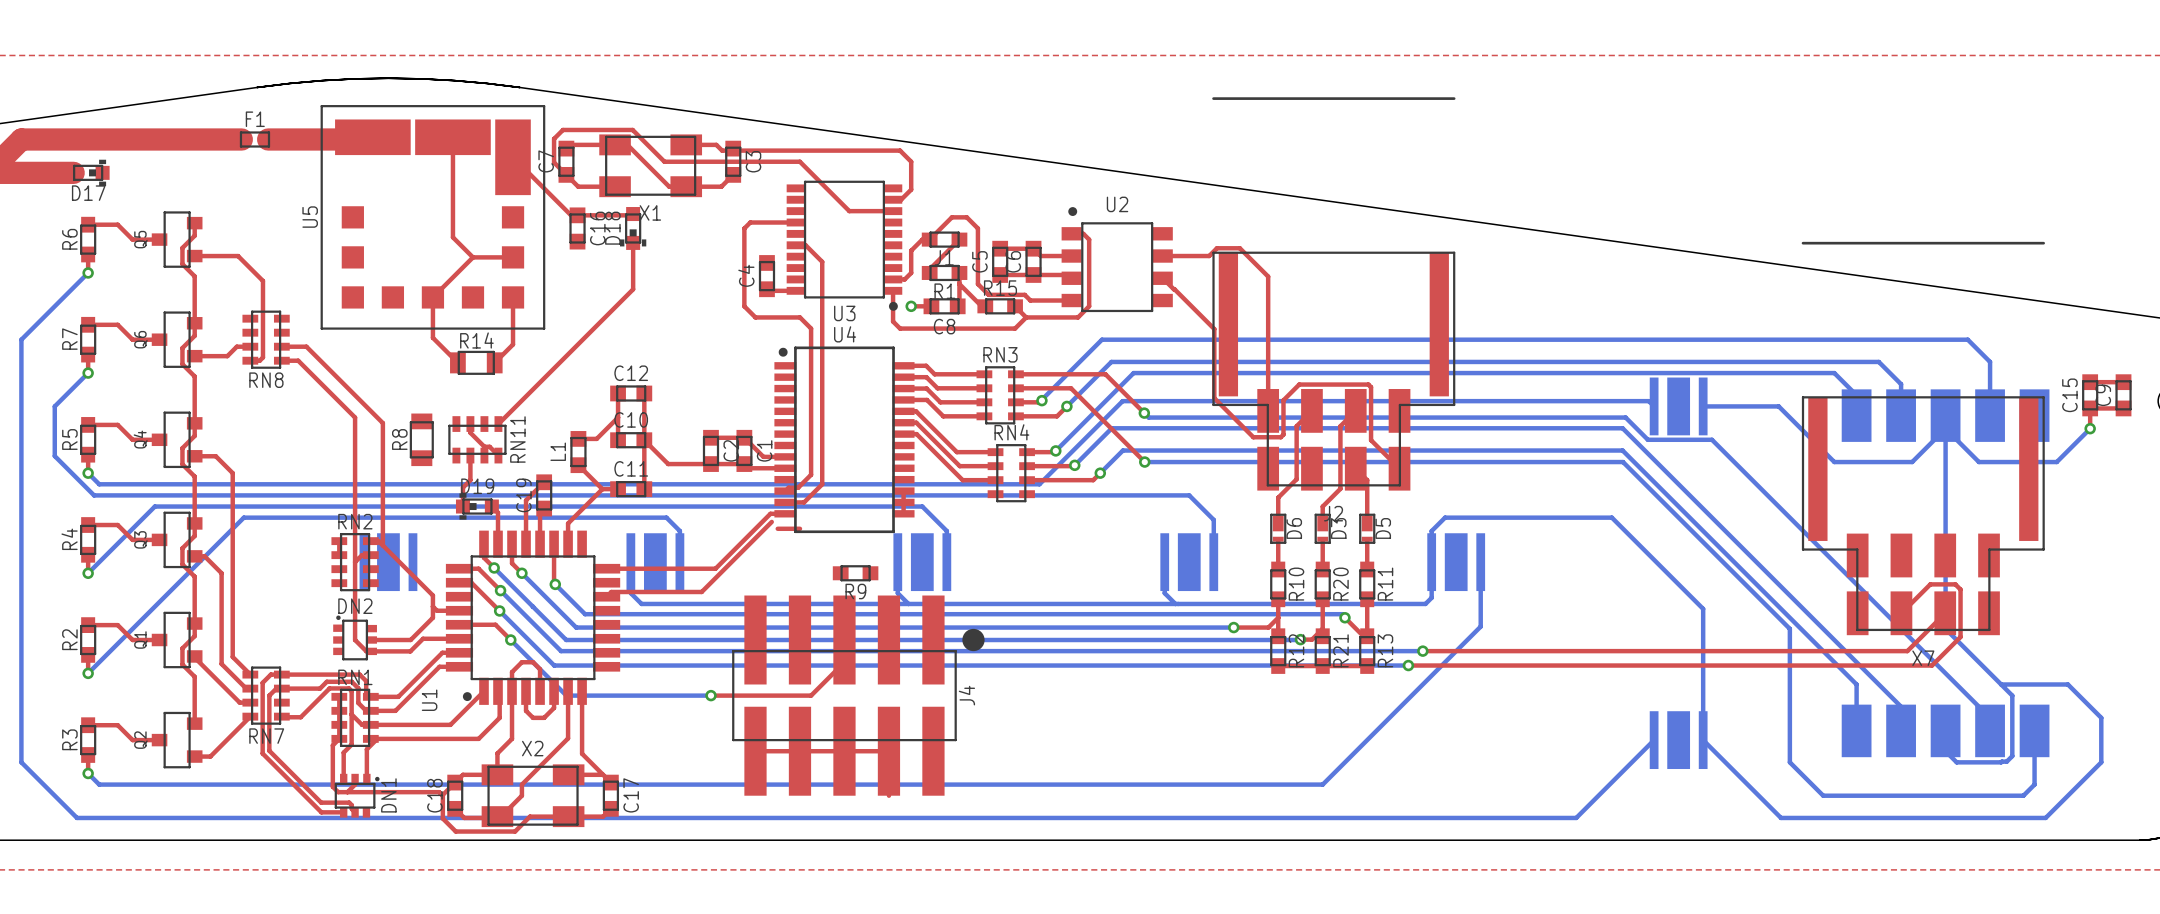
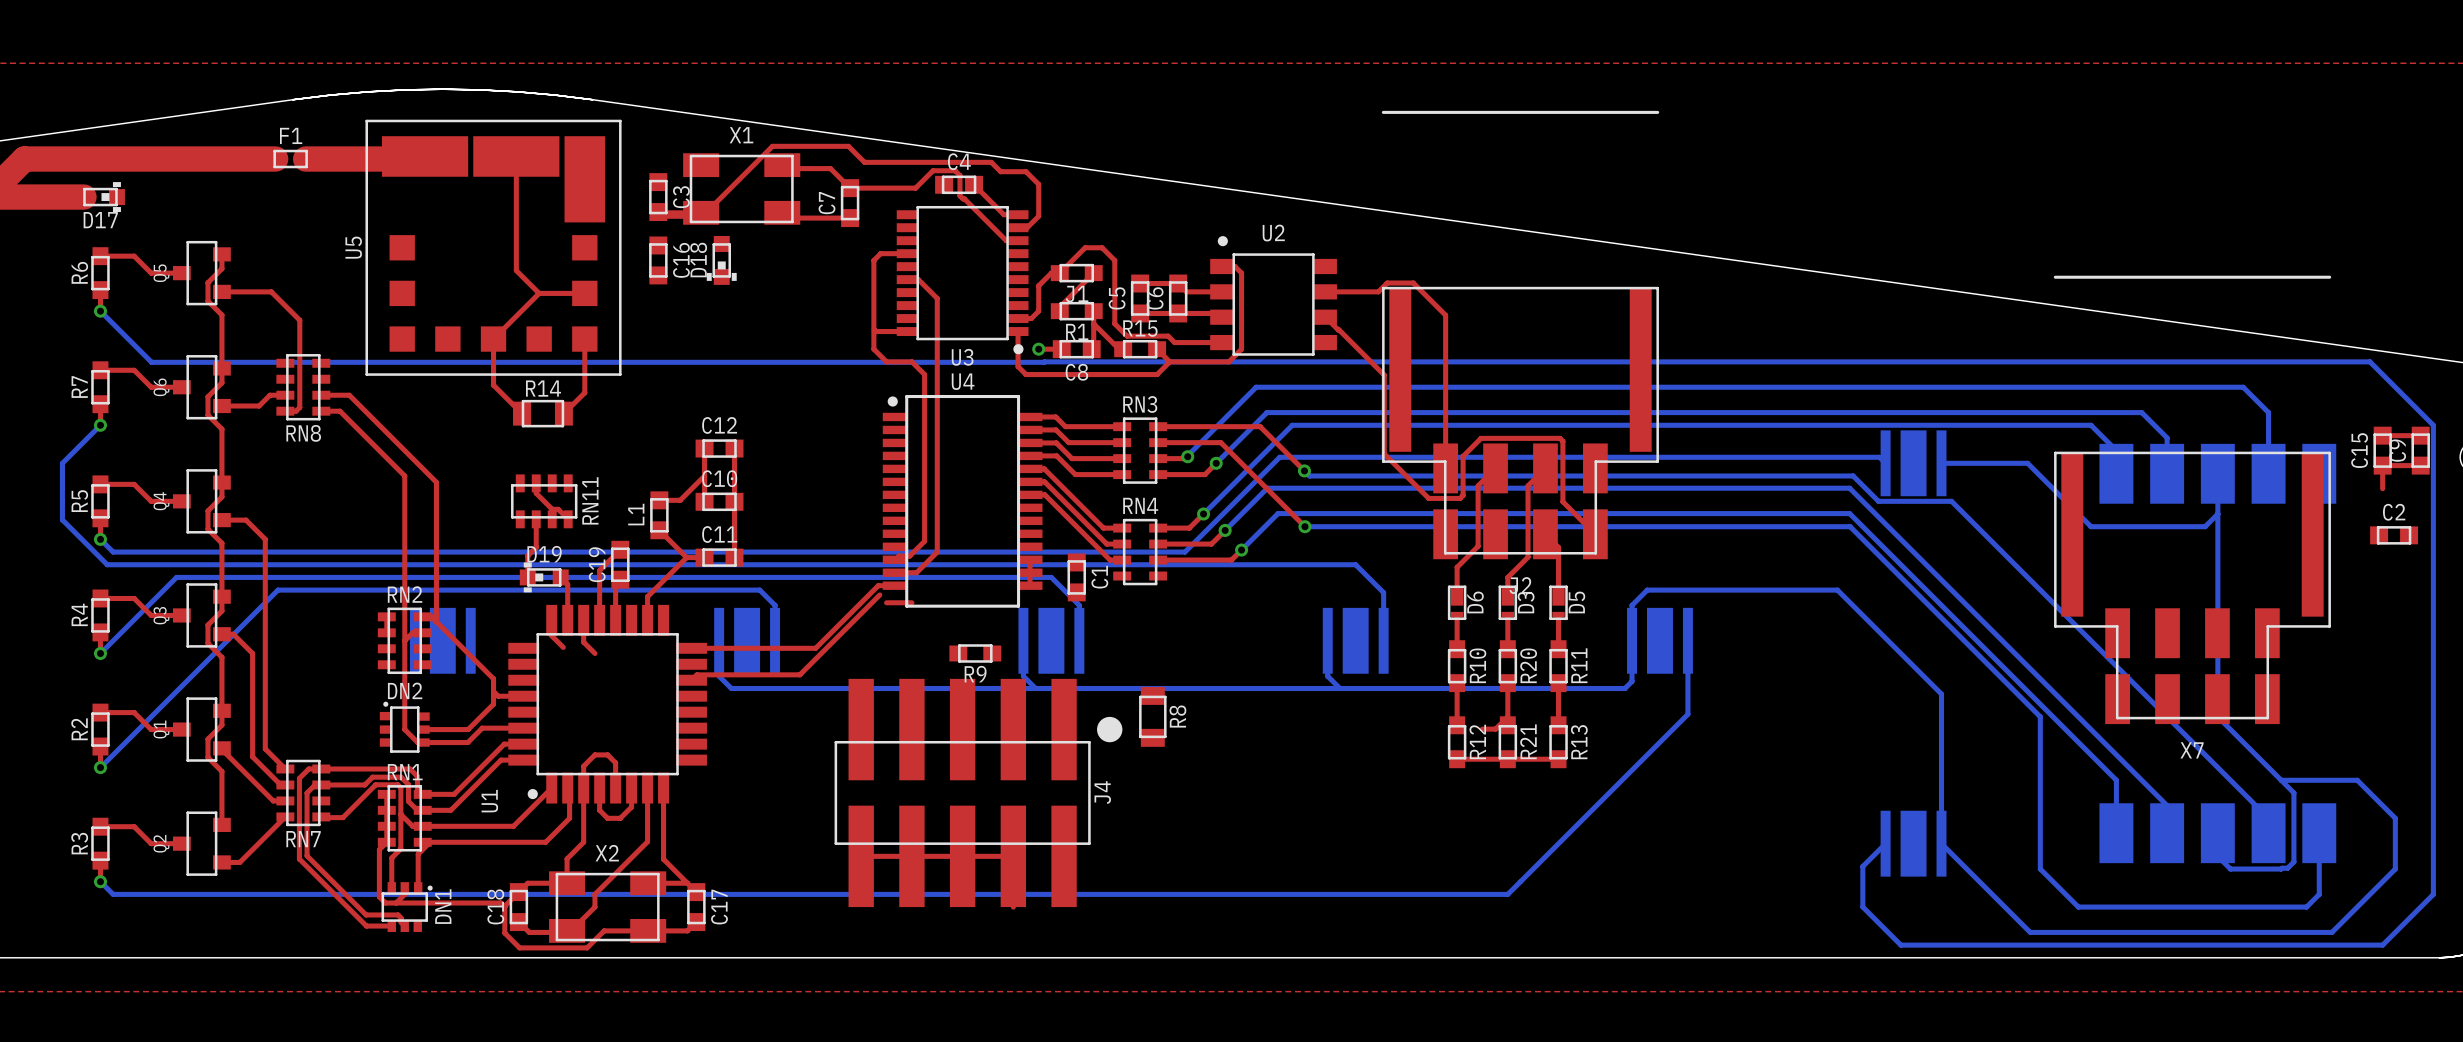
top track: (686, 144) (716, 144) (722, 150) (731, 150) (733, 148) (735, 150) (877, 150) -> (659, 212) (662, 216) (711, 216) (711, 206) (772, 146) (848, 146) (864, 162) (991, 162) (1000, 171)
top track: (566, 148) (570, 144) (627, 144) (669, 186) (721, 186) (733, 174) -> none
top track: (513, 157) (571, 215) (633, 214) -> none
C7 position: (566, 161) -> (850, 203)
C3 position: (733, 161) -> (658, 197)
top track: none -> (974, 184) (1003, 214) (1018, 214)
top track: (577, 186) (554, 162) (554, 138) (562, 129) (632, 129) (664, 161) (799, 161) (849, 211) (882, 211) -> (793, 168) (830, 168) (850, 188) (915, 188) (933, 170) (955, 170) (959, 175) (959, 195) (1006, 240)
top track: none -> (793, 216) (794, 218) (850, 218)
X1 name position: X1 (650, 212) -> X1 (741, 135)
top track: (772, 222) (750, 222) (744, 228) (744, 306) (755, 317) (777, 317) -> (880, 253) (873, 260) (873, 349) (886, 361)
top track: (633, 242) (633, 289) (498, 424) -> none
bottom track: (88, 272) (21, 339) (21, 762) (77, 817) (1576, 817) (1634, 760) -> (100, 311) (151, 362) (2369, 361) (2433, 425) (2433, 894) (2382, 945) (1900, 945) (1862, 907) (1862, 866)
C4 rotation: 0° (766, 276) -> 90° clockwise (959, 184)
C4 position: (766, 276) -> (959, 184)
bottom track: (2090, 428) (2056, 462) (1978, 462) (1945, 428) (1912, 462) -> (2217, 514) (2205, 526) (2179, 526)
via: (2090, 428) -> none
top track: (710, 437) (744, 437) (763, 456) (785, 456) -> none
R8 name position: R8 (399, 439) -> R8 (1177, 716)
R8 position: (421, 439) -> (1152, 716)
top track: (644, 440) (668, 464) (744, 464) (748, 468) (785, 468) -> none
C2 rotation: 0° (710, 450) -> 90° clockwise (2394, 535)
C2 position: (710, 450) -> (2394, 535)
C1 position: (744, 450) -> (1076, 577)
bottom track: (1122, 450) (1100, 473) -> (1280, 513) (1241, 550)
top track: (956, 452) (995, 452) -> (1090, 515) (1103, 528) (1122, 528)
top track: (1027, 452) (1054, 452) -> (1158, 528) (1189, 528) (1202, 515)
top track: (959, 466) (995, 466) -> (1094, 531) (1106, 544) (1122, 544)
top track: (1027, 466) (1073, 466) -> (1158, 544) (1211, 544) (1224, 531)
RN4 position: (1011, 473) -> (1140, 552)
top track: (1100, 473) (1093, 480) (1027, 480) -> none
via position: (1100, 473) -> (1241, 550)
top track: (962, 480) (995, 480) -> (1097, 547) (1110, 560) (1122, 560)
top track: none -> (1241, 550) (1231, 560) (1158, 560)
top track: (554, 544) (555, 584) -> none
bottom track: (494, 567) (566, 640) (1300, 639) -> none
via: (494, 567) -> none
top track: (459, 568) (478, 568) (500, 590) -> none
bottom track: (521, 573) (576, 627) (1233, 627) -> none
via: (521, 573) -> none
top track: (459, 582) (471, 582) (499, 610) -> none
bottom track: (555, 584) (585, 614) (1342, 614) (1344, 617) -> none
via: (555, 584) -> none
bottom track: (500, 590) (561, 651) (1422, 651) -> none
via: (500, 590) -> none
bottom track: (499, 610) (554, 665) (1408, 665) -> none
via: (499, 610) -> none
top track: (1901, 613) (1930, 584) (1955, 584) (1960, 589) (1960, 637) (1932, 665) (1408, 665) -> none
top track: (1945, 613) (1907, 651) (1422, 651) -> none
top track: (1278, 617) (1268, 627) (1233, 627) -> none
top track: (1344, 617) (1363, 636) (1367, 636) -> none
via: (1344, 617) -> none
top track: (459, 624) (495, 624) (510, 640) -> none
via: (1233, 627) -> none
via: (1300, 639) -> none
bottom track: (510, 640) (566, 695) (710, 695) -> none
via: (510, 640) -> none
top track: (844, 640) (844, 662) (811, 695) (710, 695) -> none
via: (1422, 651) -> none
via: (1408, 665) -> none
via: (710, 695) -> none

